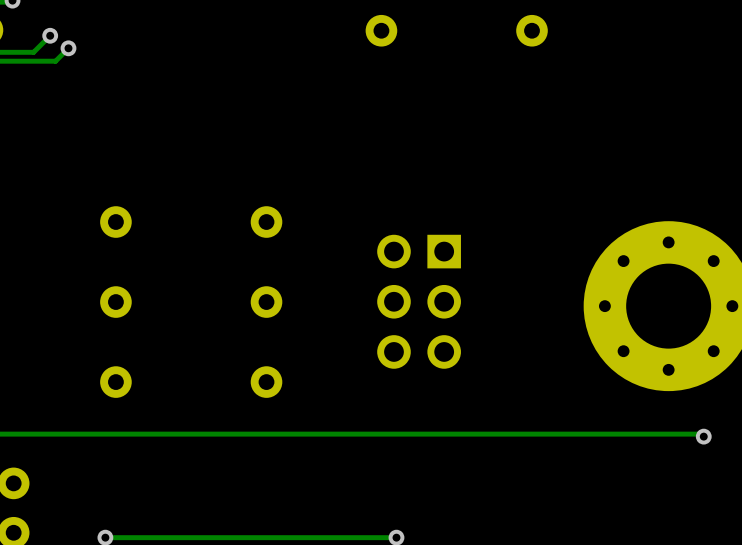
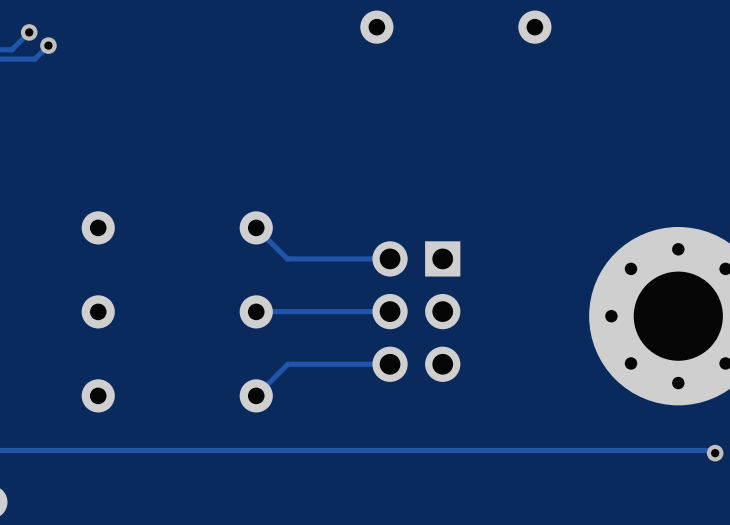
track: none -> (256, 227) (287, 258) (390, 258)
track: none -> (390, 311) (256, 311)
track: none -> (390, 364) (287, 364) (256, 395)

